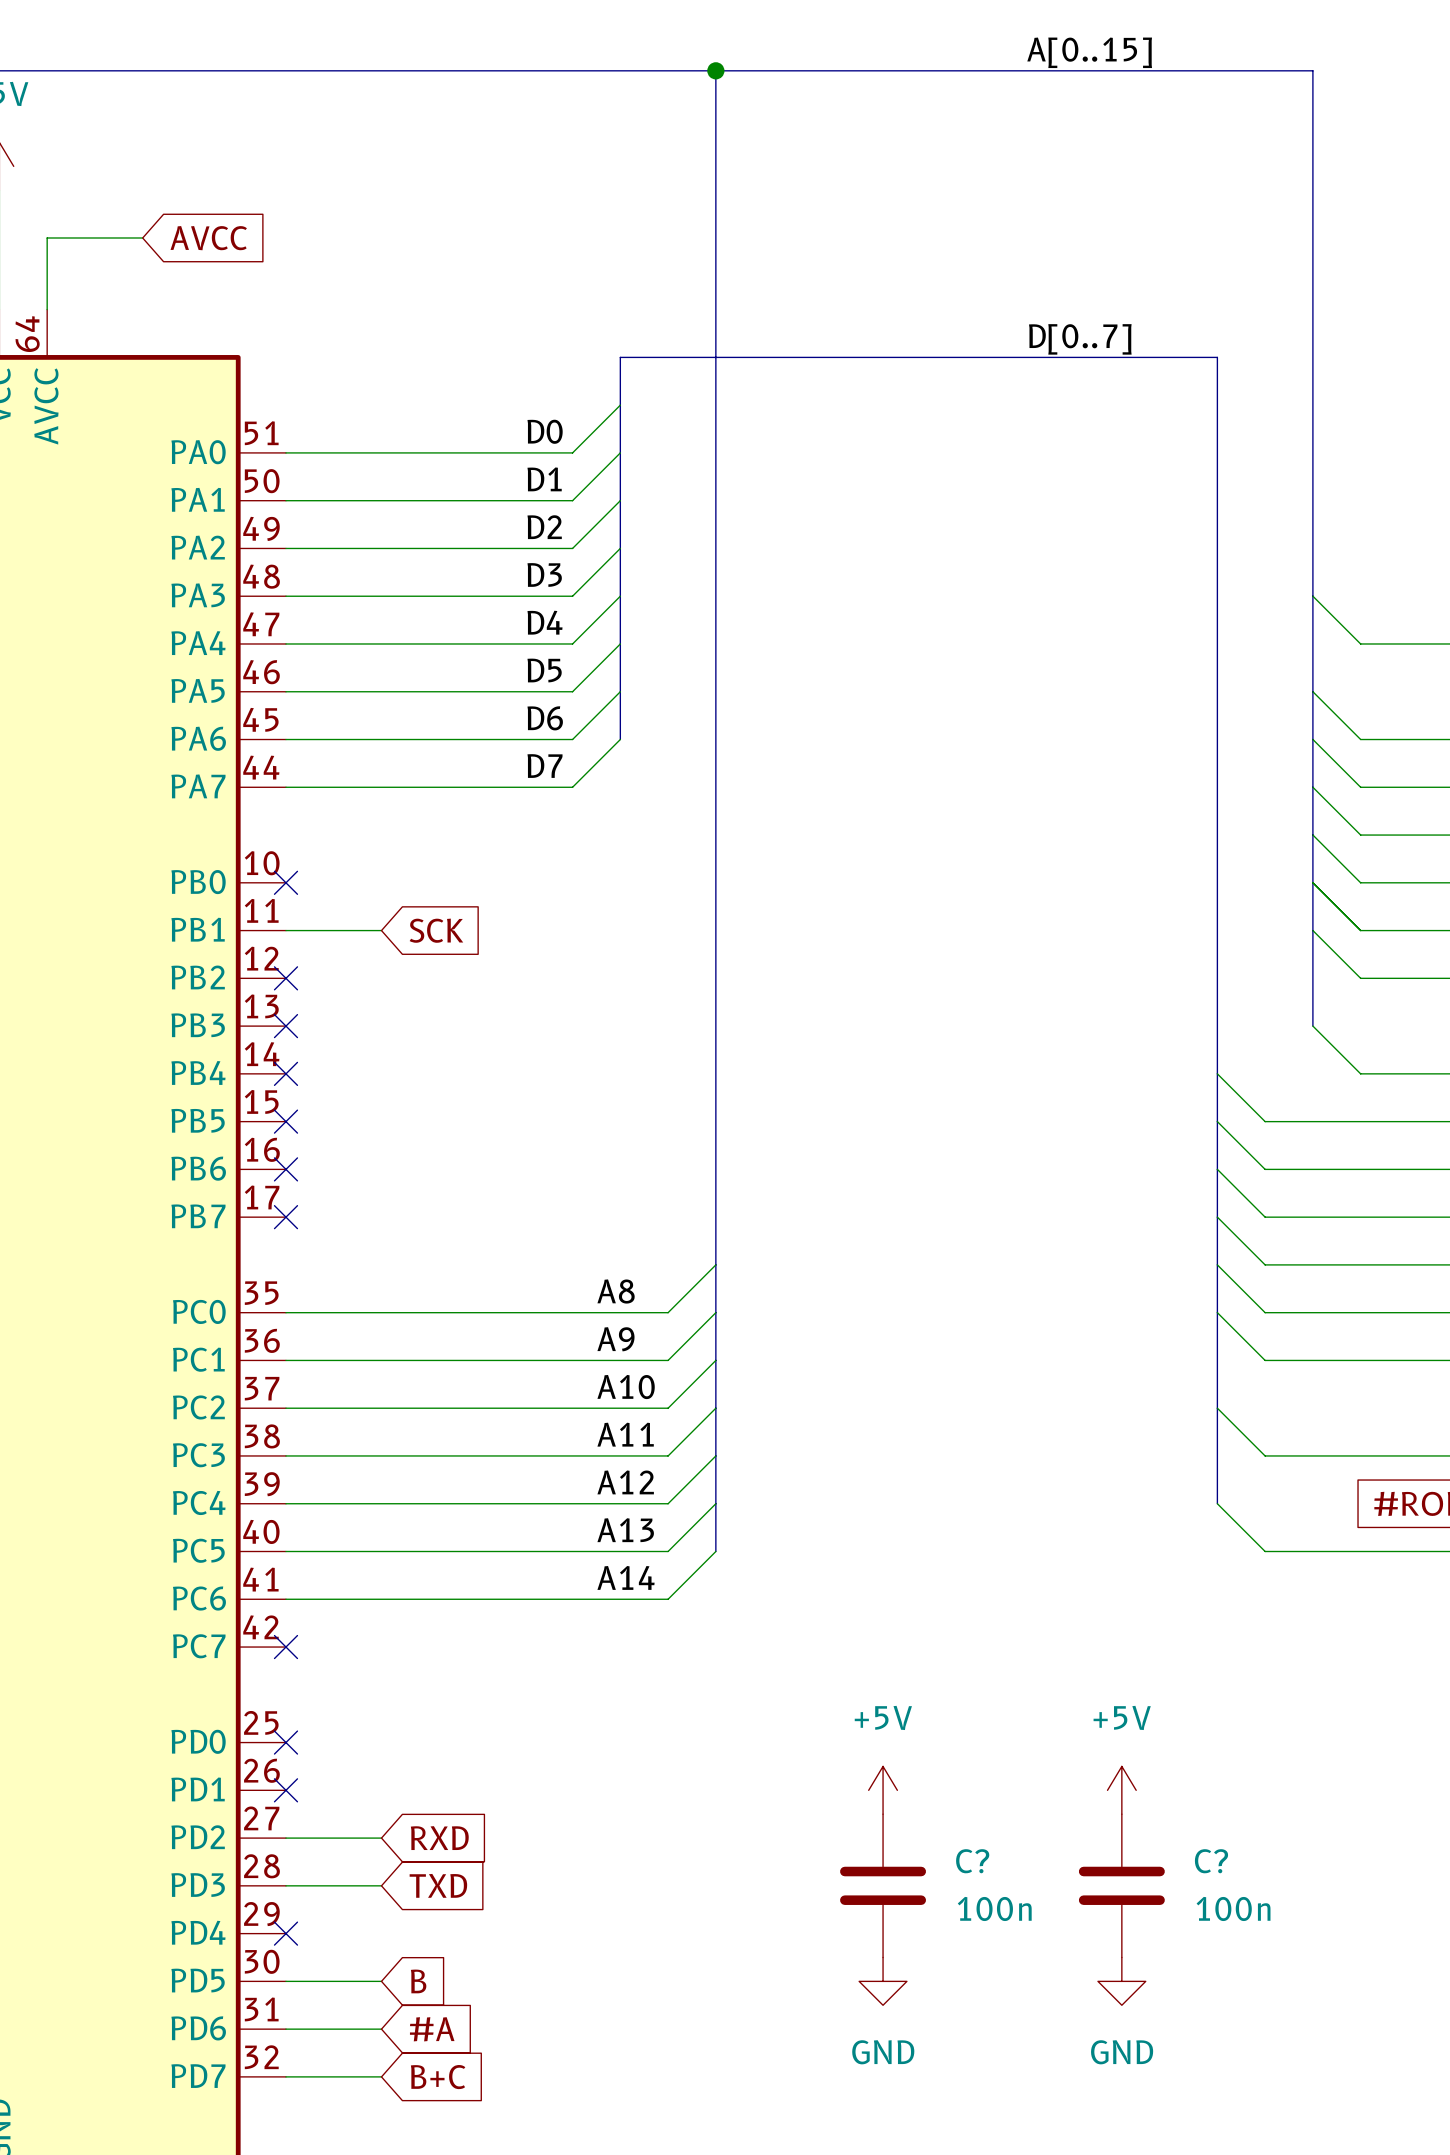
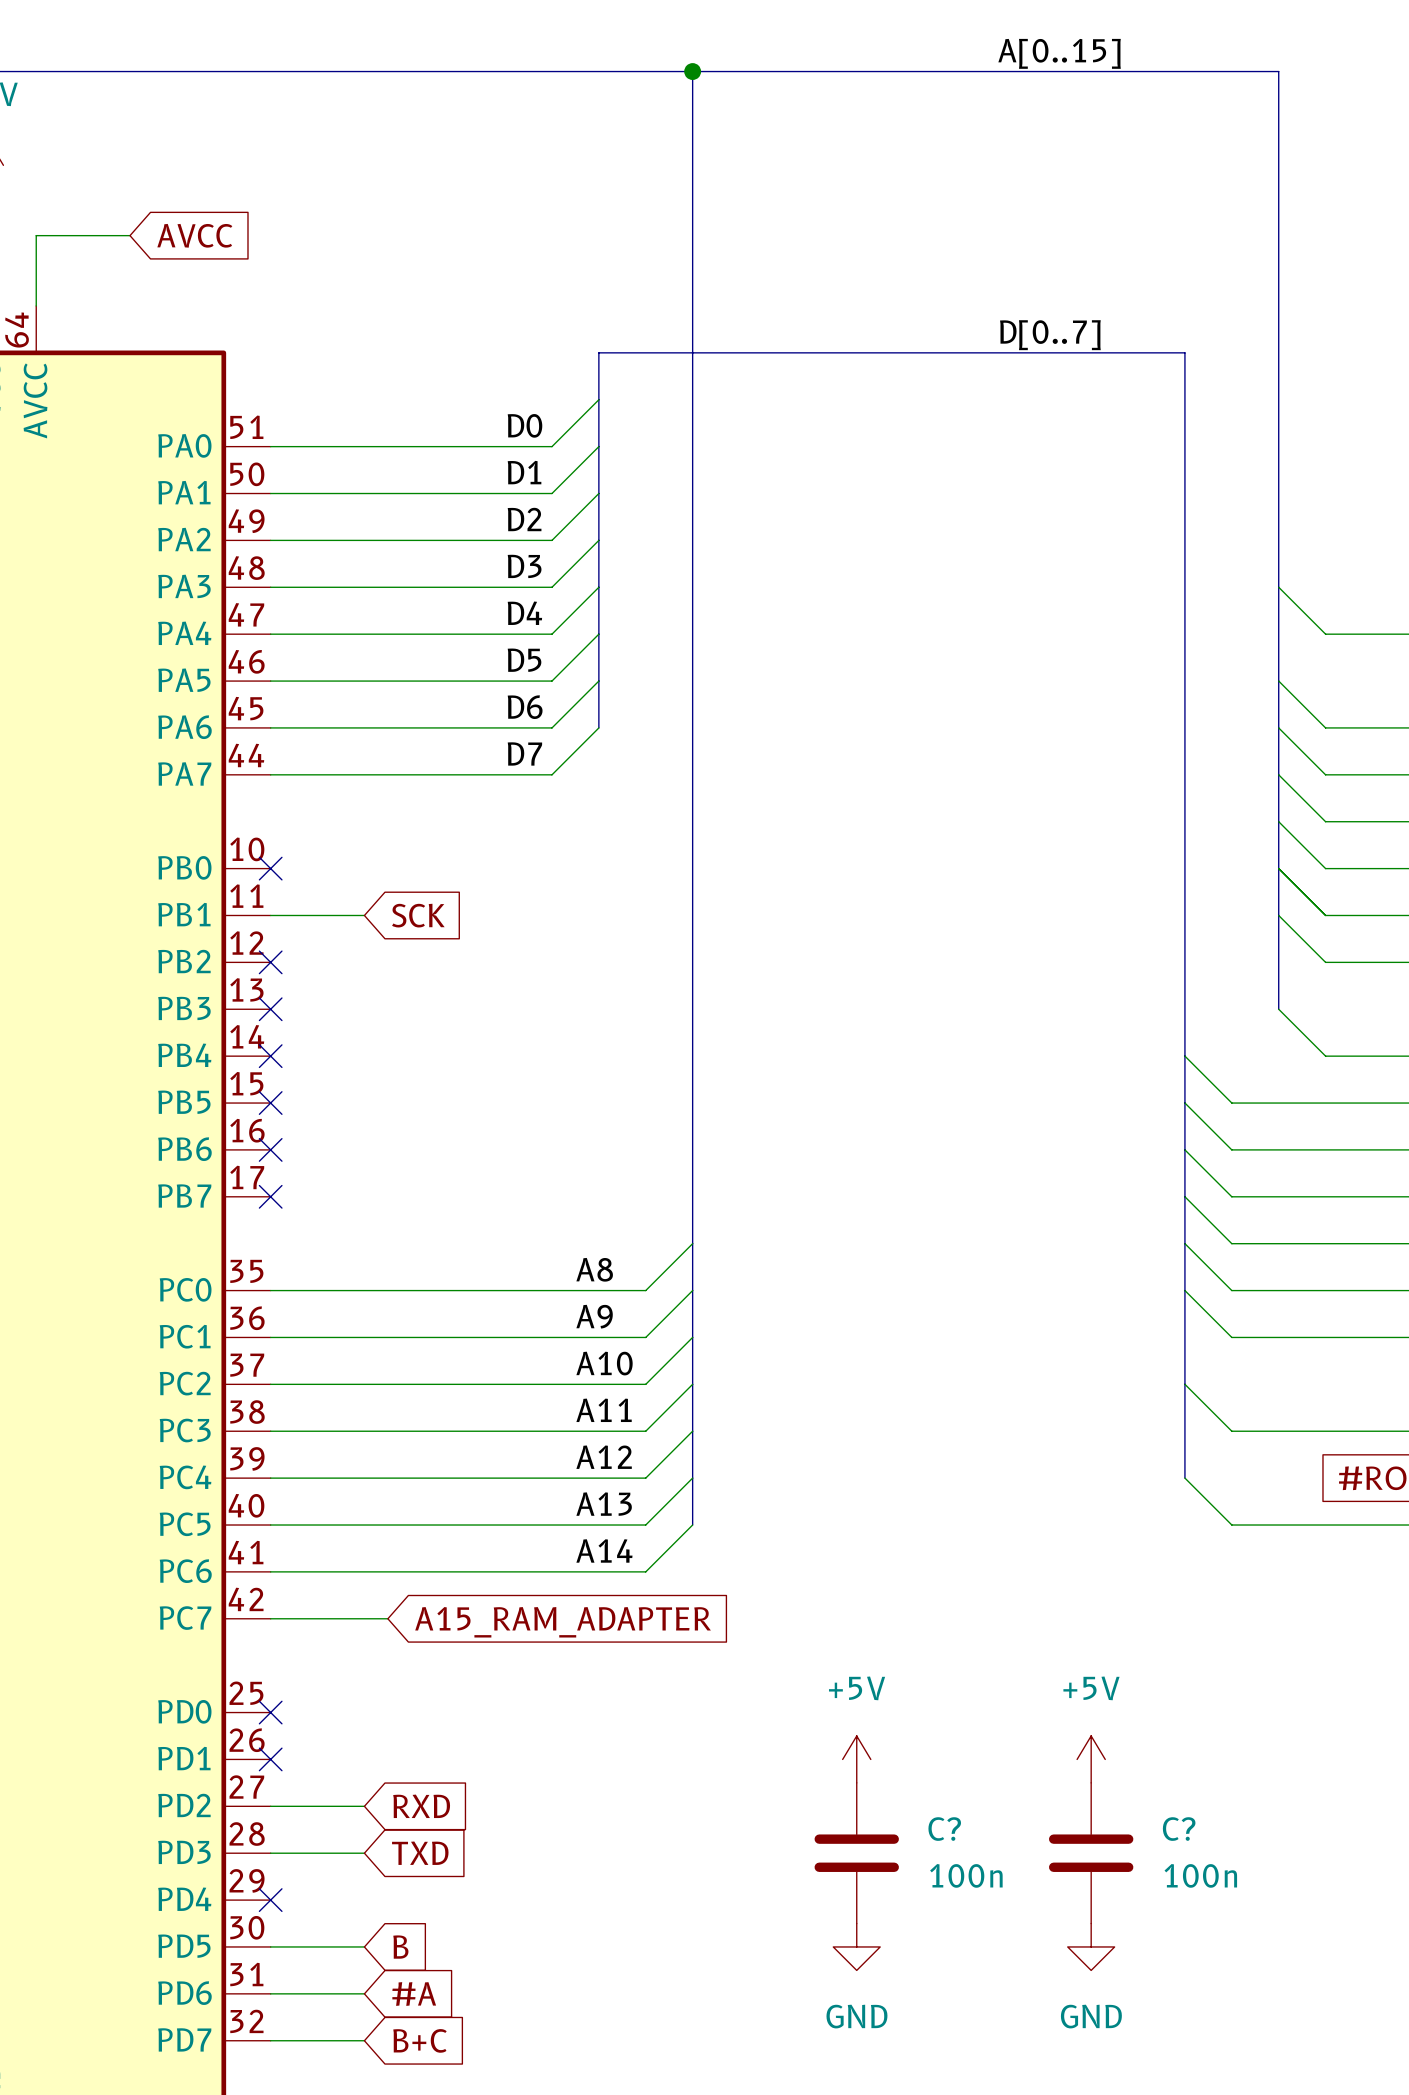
wire: none -> (270, 1618) (387, 1618)
no-connect mark: (285, 1647) -> none
global label: none -> A15_RAM_ADAPTER (563, 1622)

